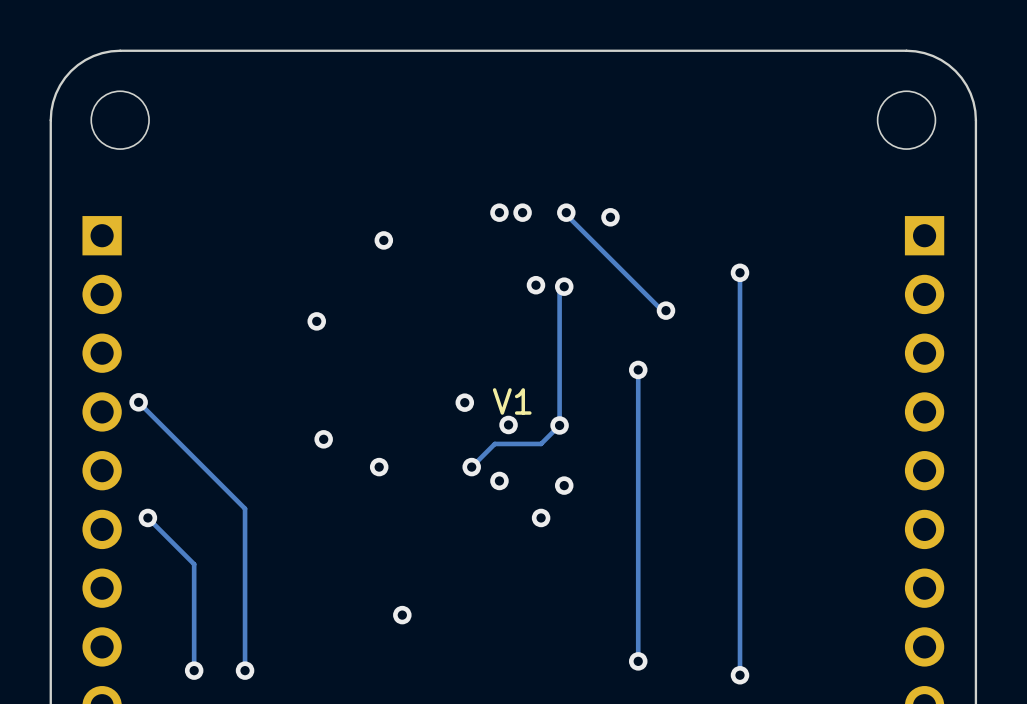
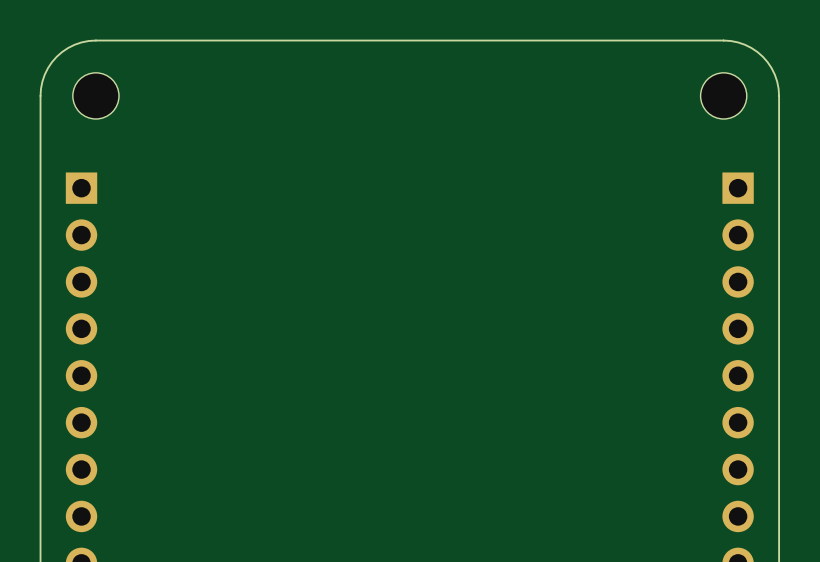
via: (499, 212) -> none
via: (522, 212) -> none
track: (566, 212) (662, 310) -> none
via: (566, 212) -> none
via: (610, 217) -> none
via: (383, 240) -> none
track: (740, 272) (740, 675) -> none
via: (740, 272) -> none
via: (535, 285) -> none
track: (564, 286) (559, 291) (559, 425) (541, 443) (494, 443) (471, 467) -> none
via: (564, 286) -> none
via: (665, 310) -> none
via: (316, 321) -> none
track: (638, 369) (638, 661) -> none
via: (638, 369) -> none
text: V1 (512, 401) -> none
track: (138, 402) (245, 508) (245, 670) -> none
via: (138, 402) -> none
via: (464, 402) -> none
via: (508, 424) -> none
via: (559, 425) -> none
via: (323, 439) -> none
via: (379, 467) -> none
via: (471, 467) -> none
via: (499, 480) -> none
via: (564, 485) -> none
track: (147, 517) (194, 564) (194, 670) -> none
via: (147, 517) -> none
via: (541, 517) -> none
via: (402, 615) -> none
via: (638, 661) -> none
via: (194, 670) -> none
via: (245, 670) -> none
via: (740, 675) -> none

